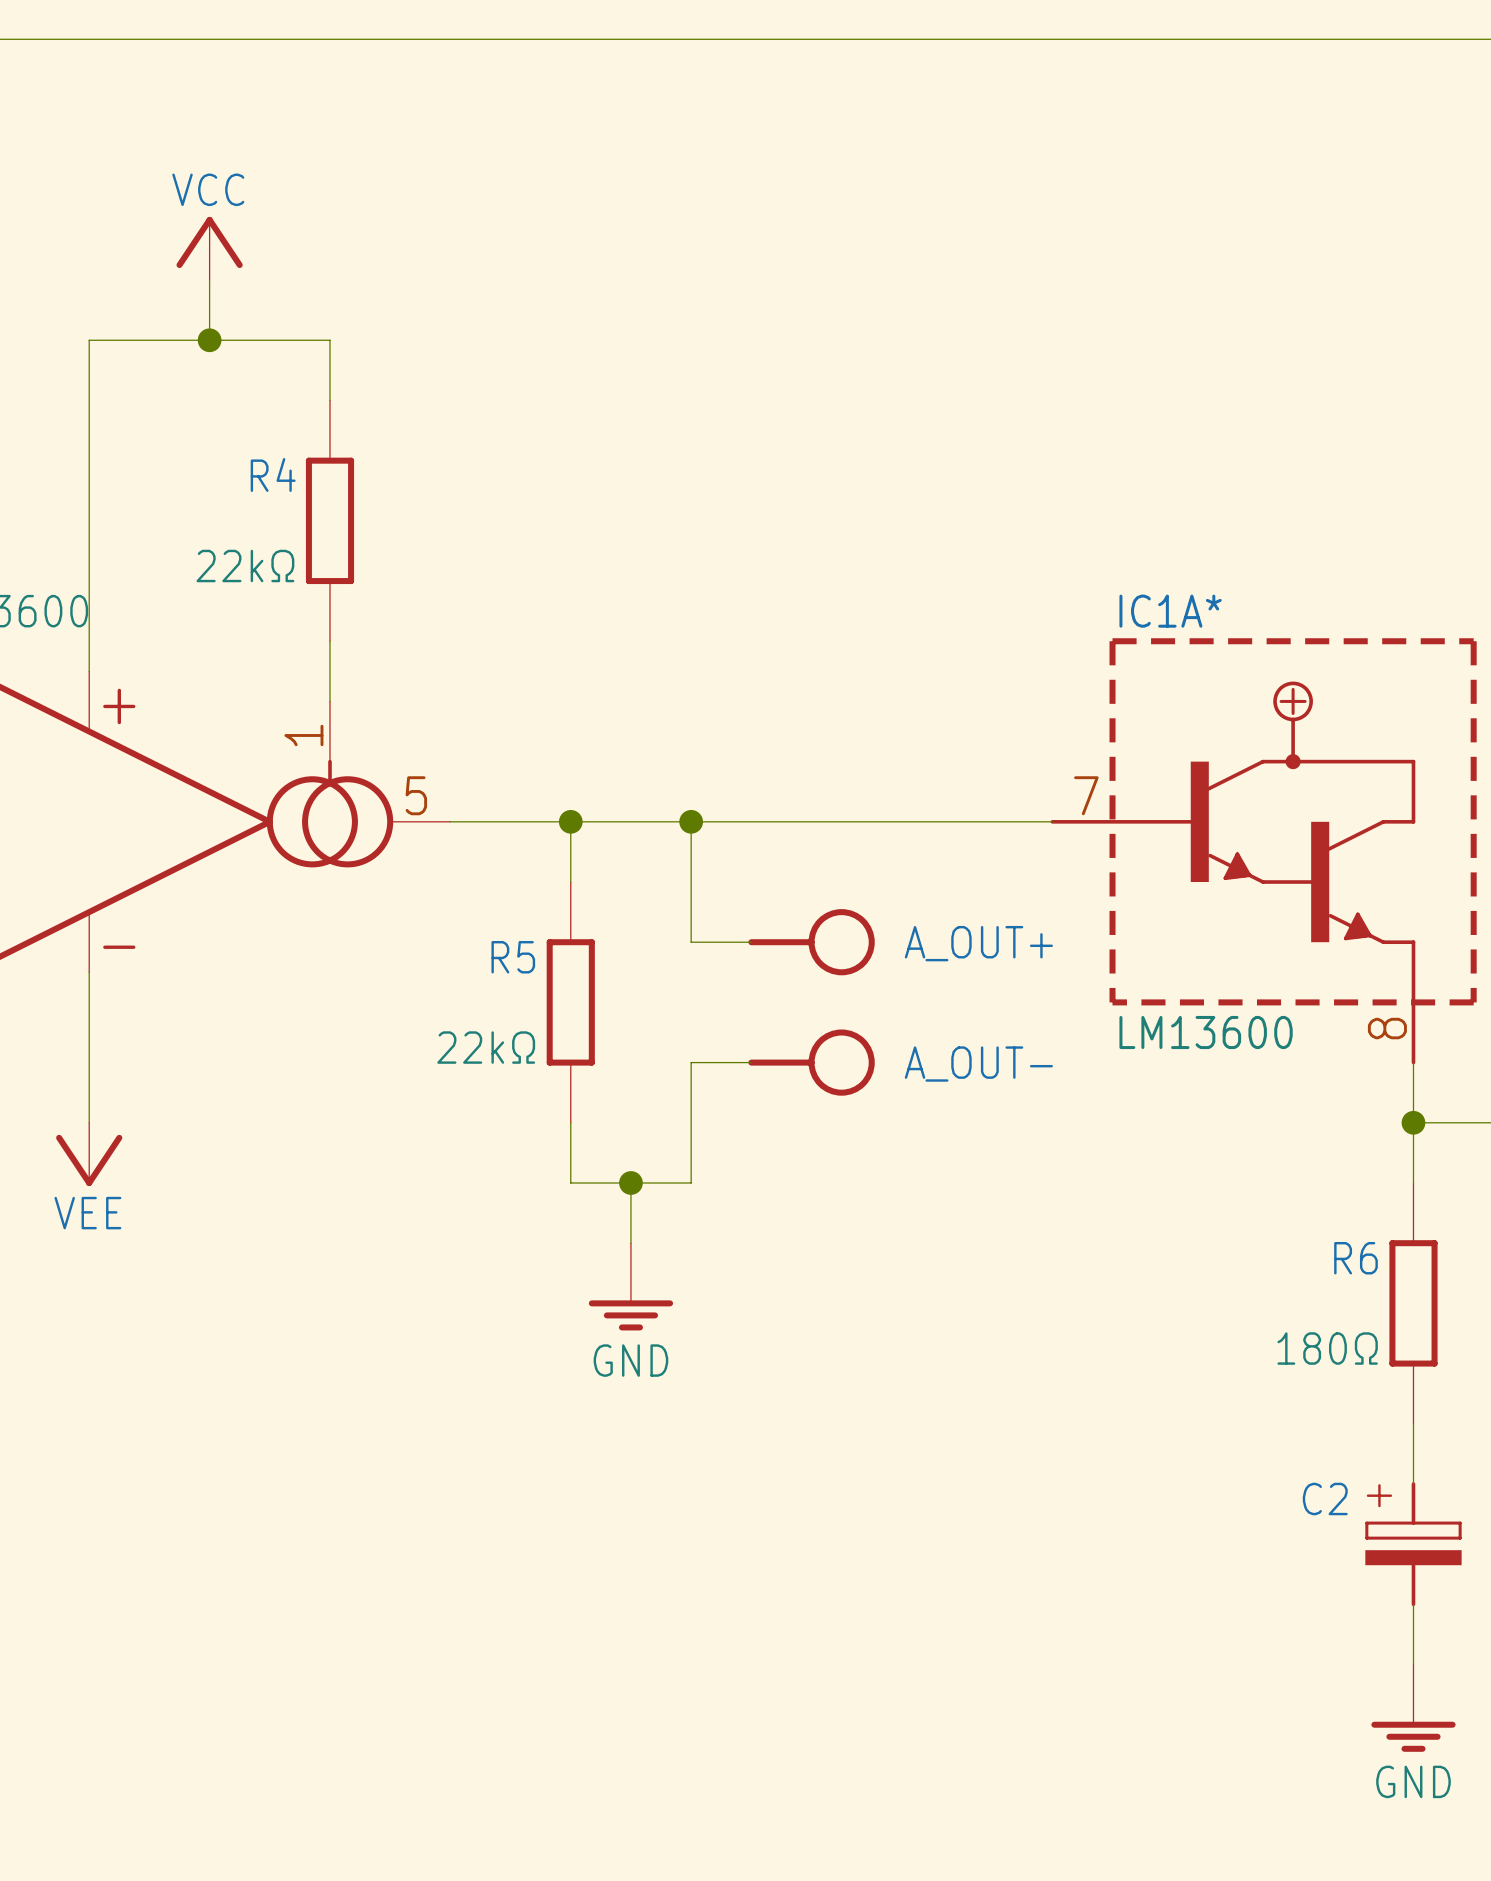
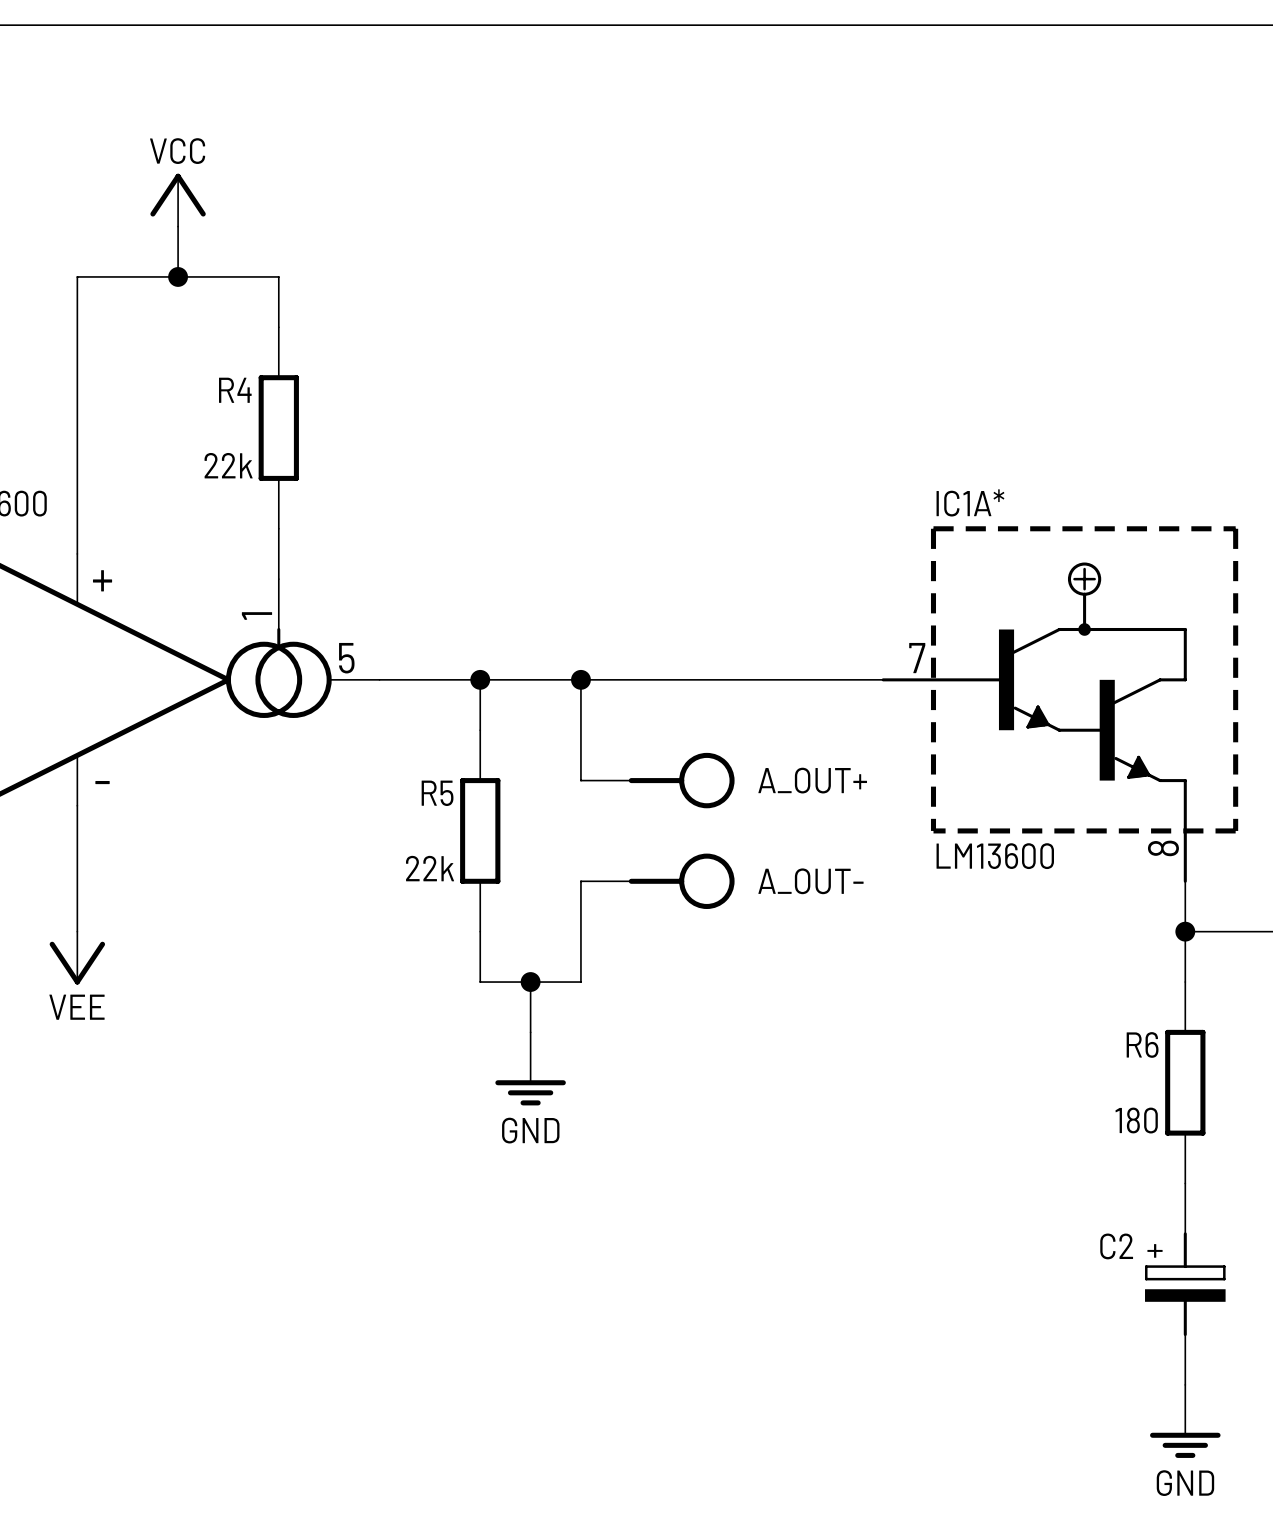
R4 value: 22kΩ (245, 566) -> 22k (228, 465)
R5 value: 22kΩ (486, 1047) -> 22k (430, 868)
R6 value: 180Ω (1327, 1348) -> 180 (1136, 1120)

